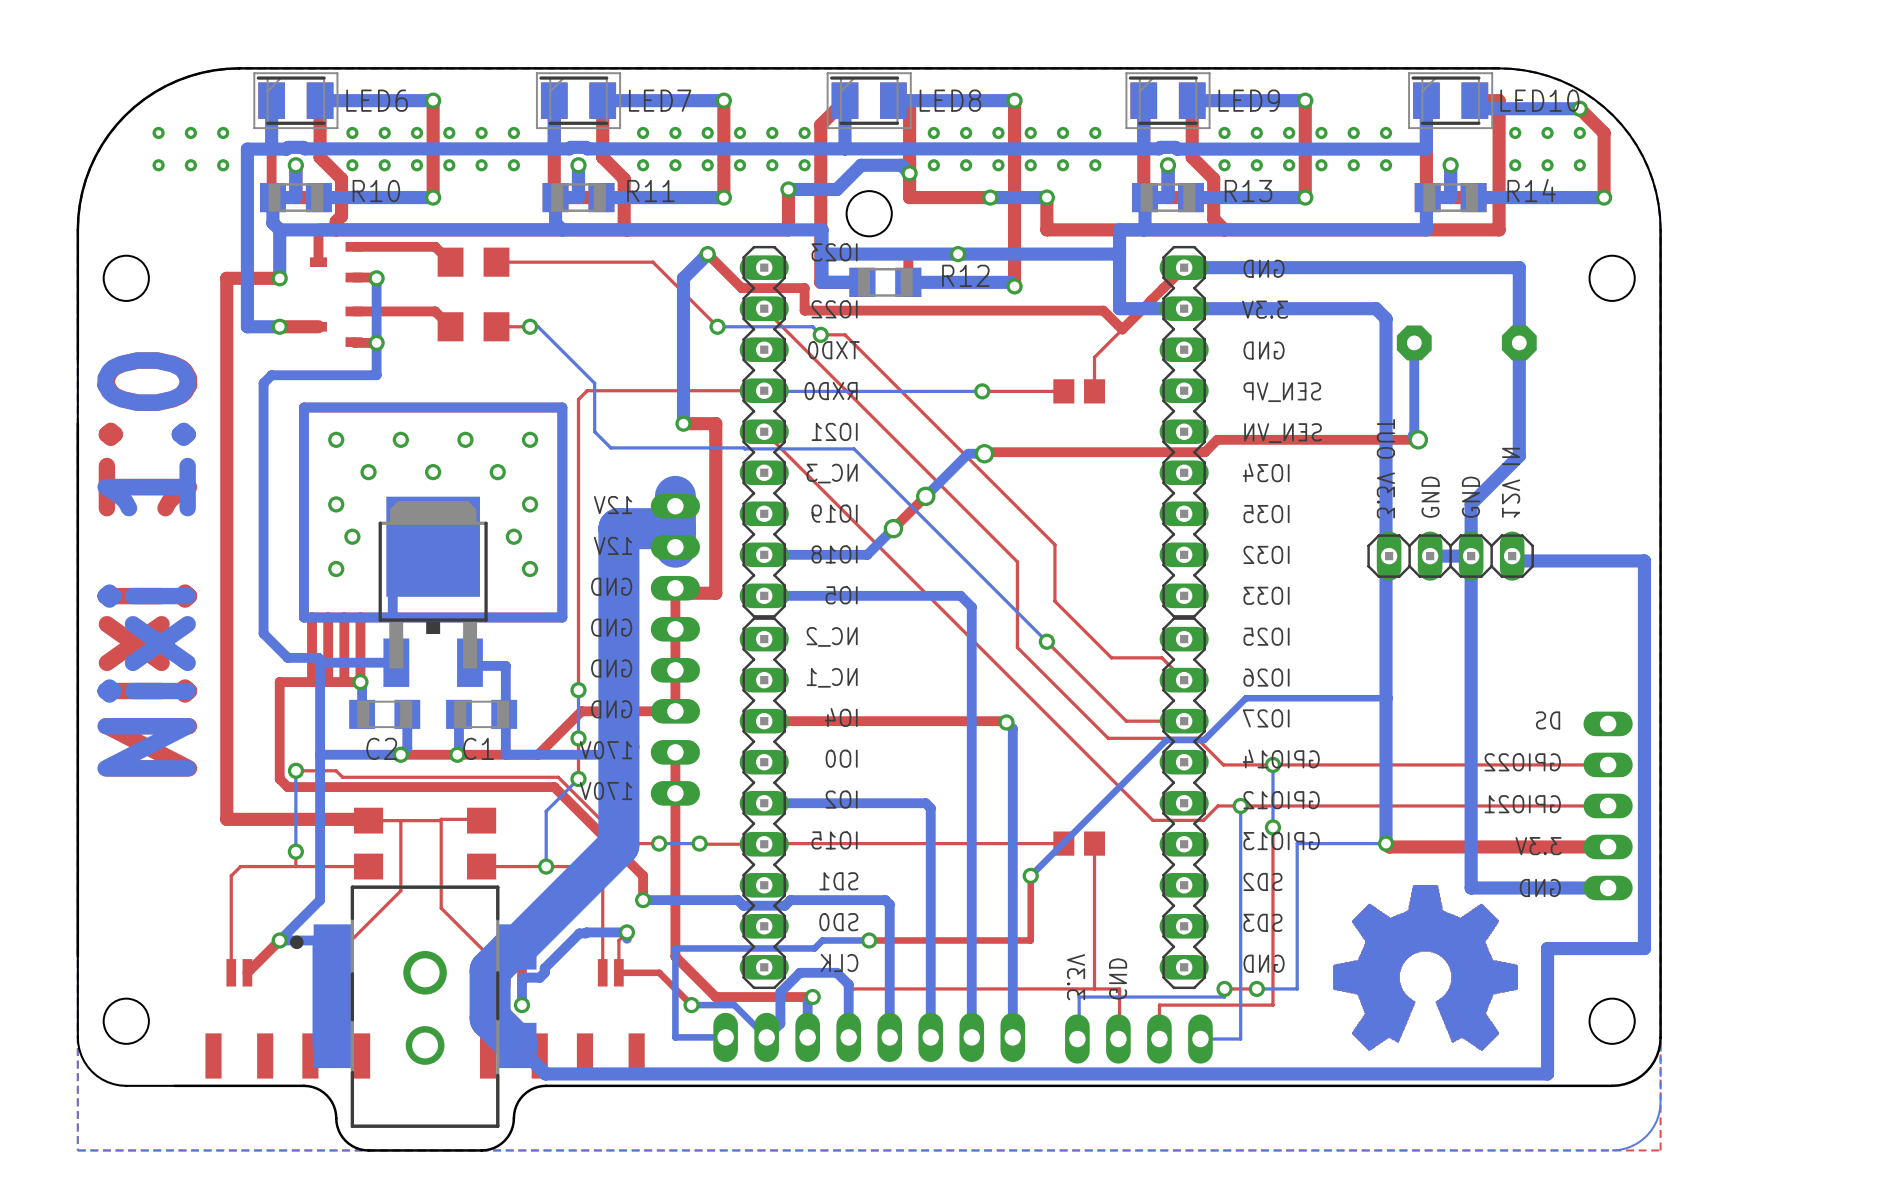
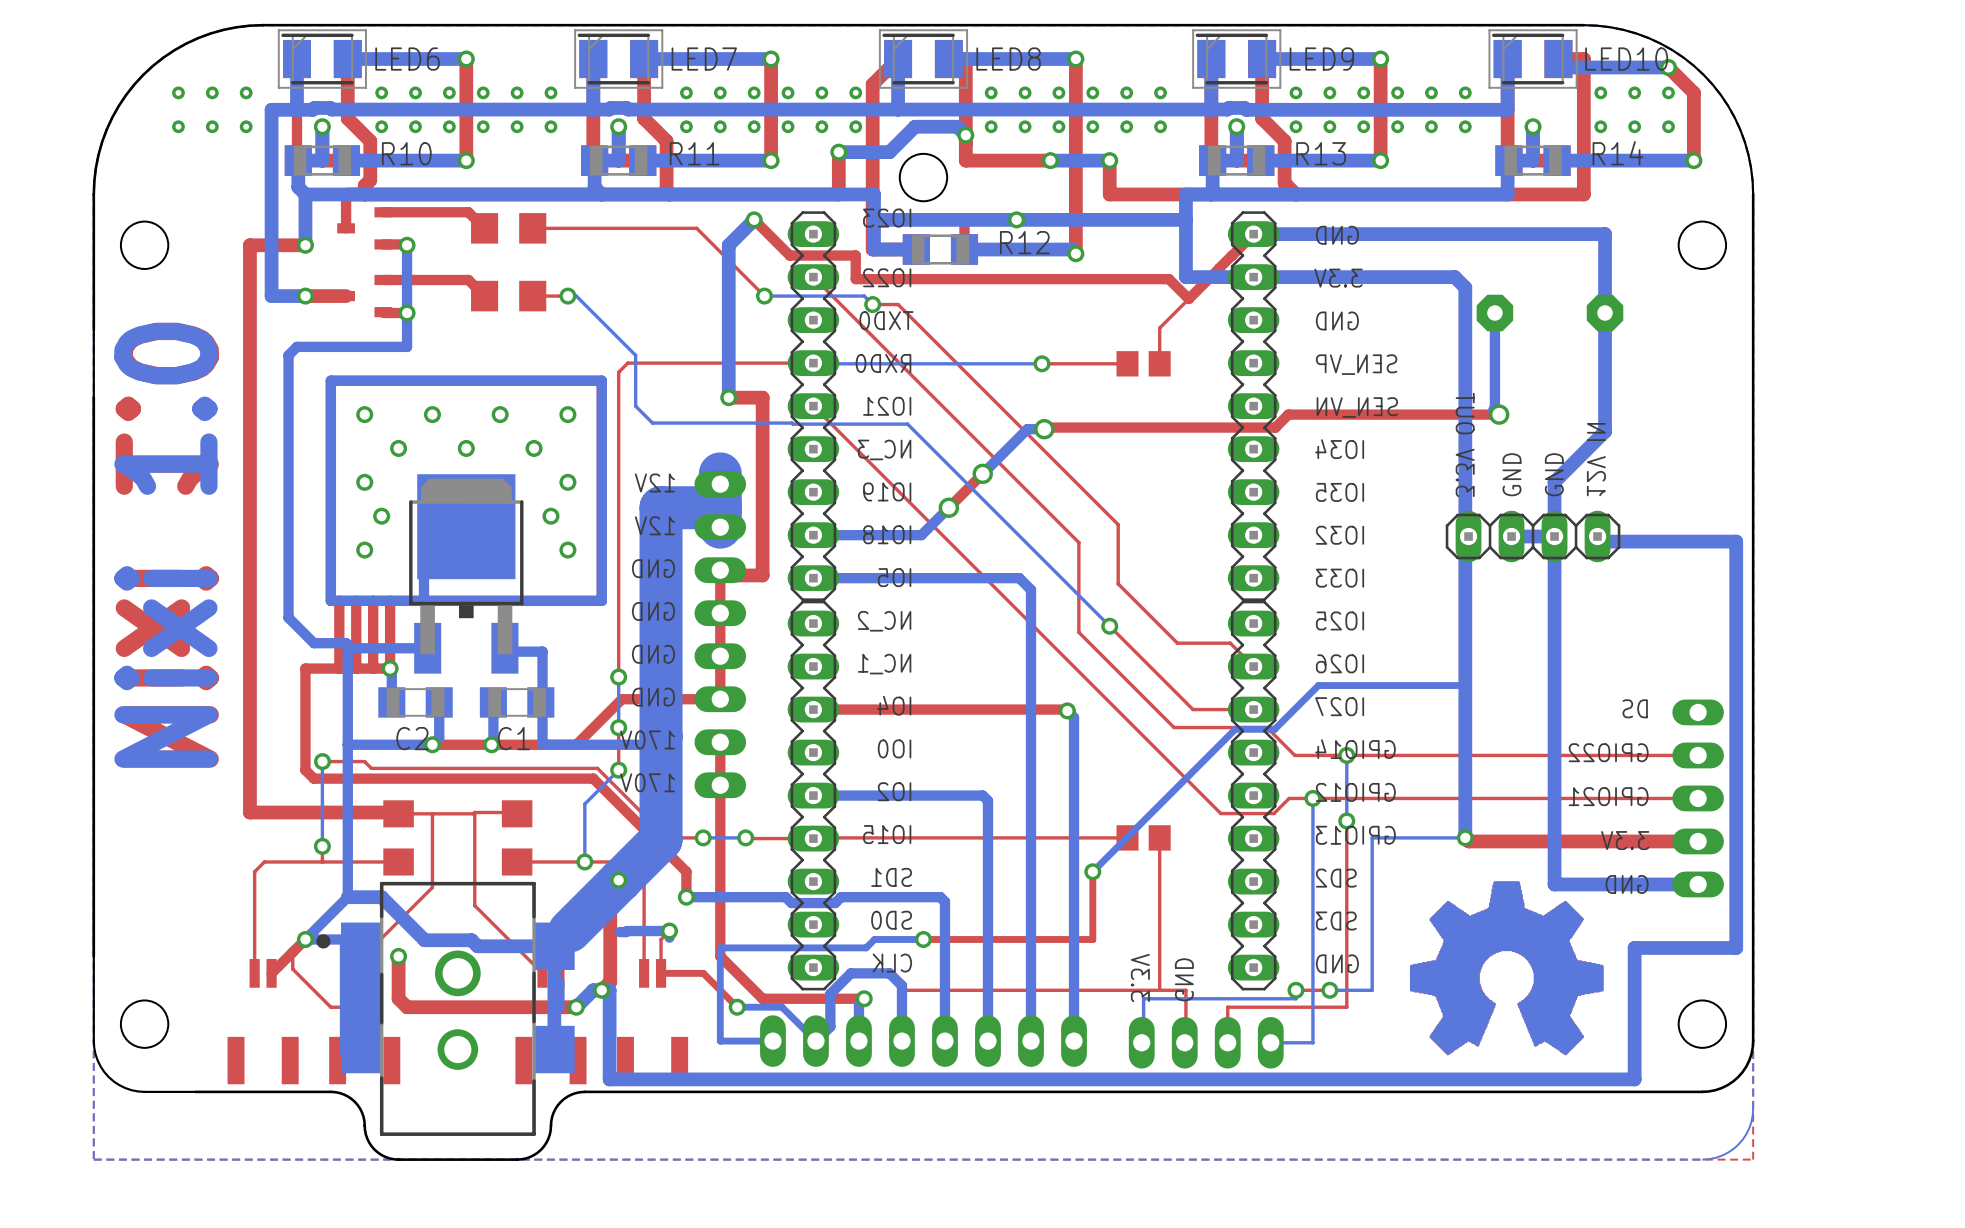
top track: none -> (618, 880) (610, 888) (610, 981) (601, 990)
via: none -> (618, 880)
bottom track: (579, 933) (538, 974) (521, 974) (521, 980) (525, 977) (539, 977) (544, 972) (544, 968) (579, 933) -> none
bottom track: (517, 946) (511, 949) (490, 970) (490, 1018) (517, 1045) -> (347, 897) (381, 897) (424, 940) (471, 940) (477, 946) (554, 946) (554, 1049)
top track: none -> (292, 952) (292, 969) (330, 1007) (373, 1007) (373, 973)
top track: none -> (398, 956) (398, 998) (407, 1007) (576, 1007)
via: none -> (398, 956)
via: none -> (601, 990)
via position: (521, 1005) -> (576, 1007)
bottom track: (517, 1045) (545, 1073) (569, 1073) -> (576, 1007) (593, 990) (609, 990) (609, 1079)

